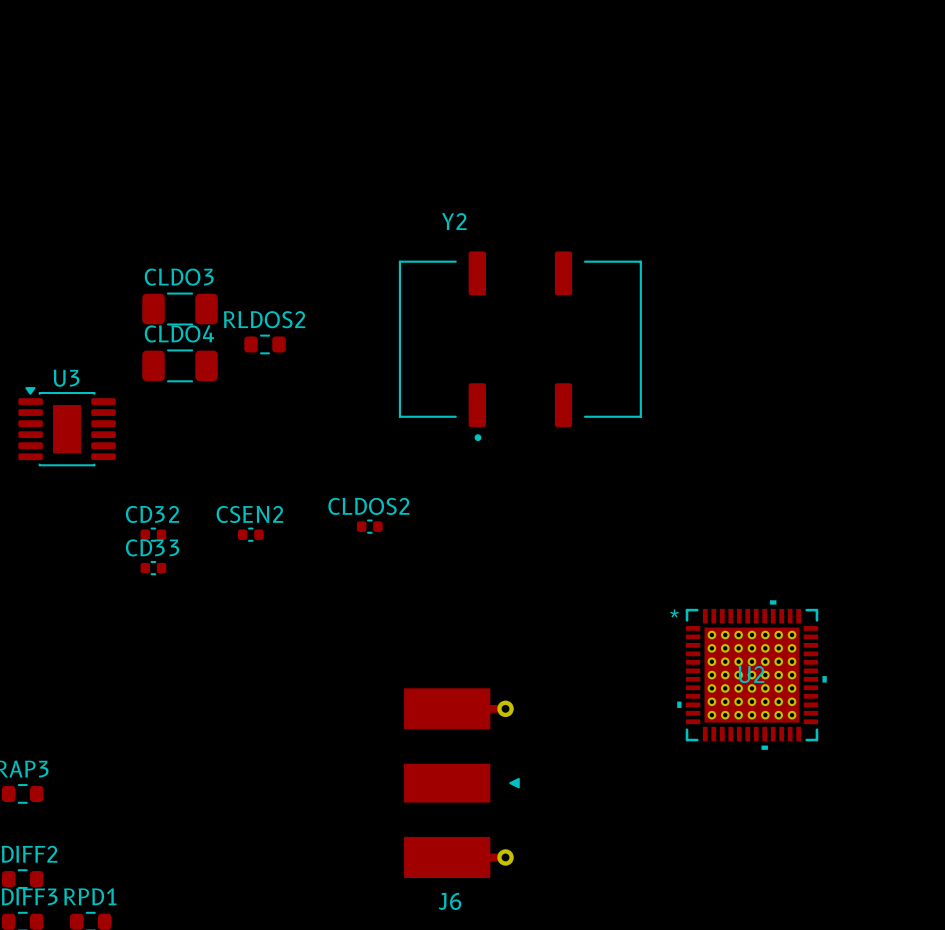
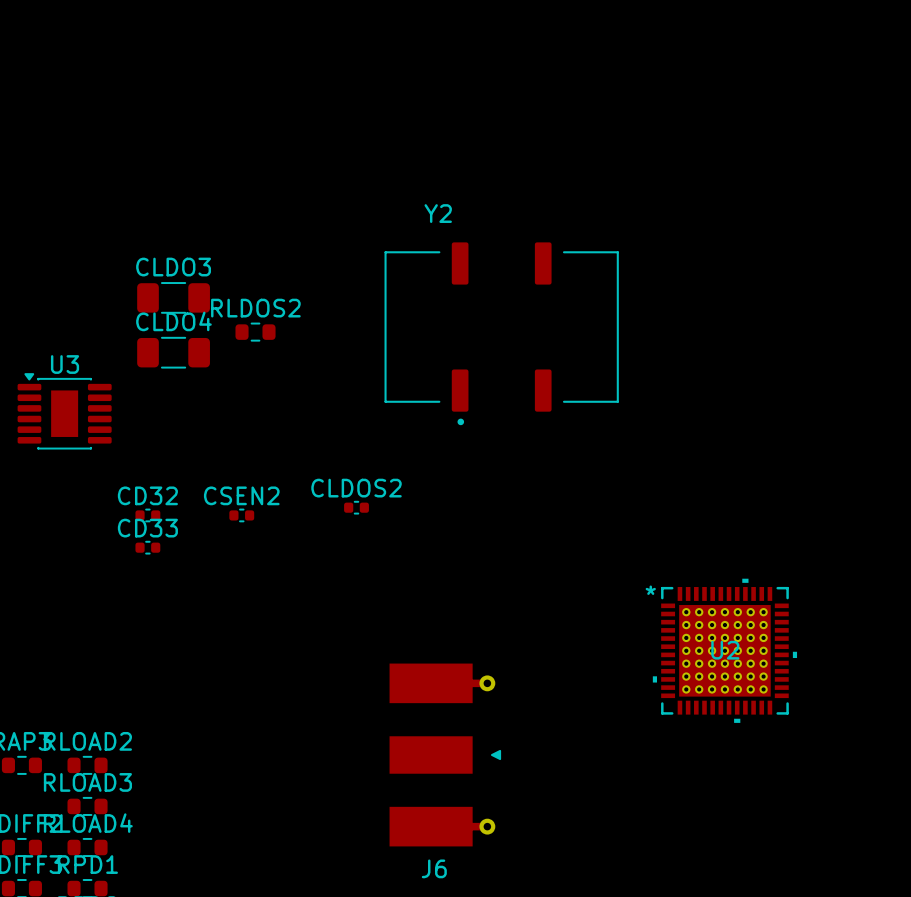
RLOAD2: none -> (87, 765)
RLOAD3: none -> (87, 806)
RLOAD4: none -> (87, 847)

